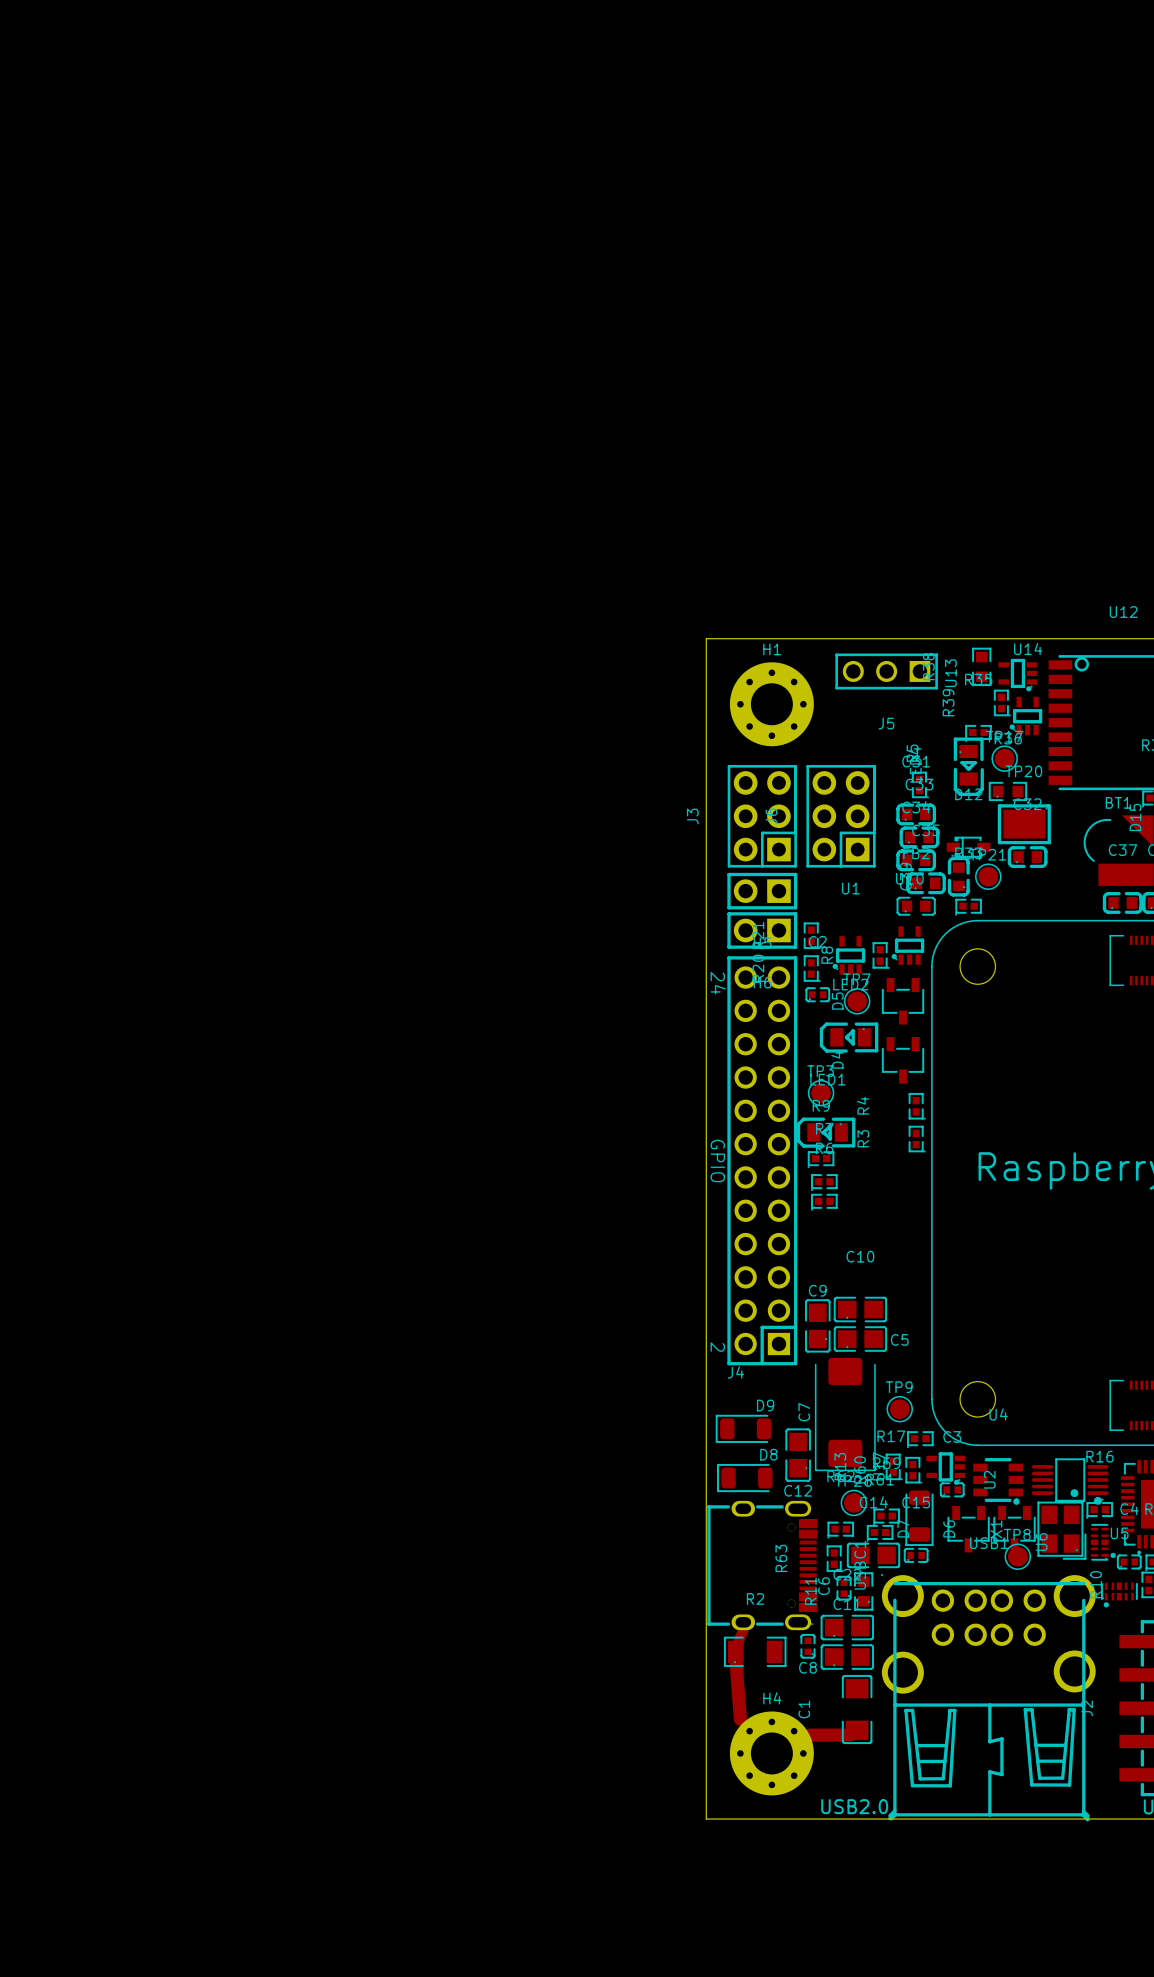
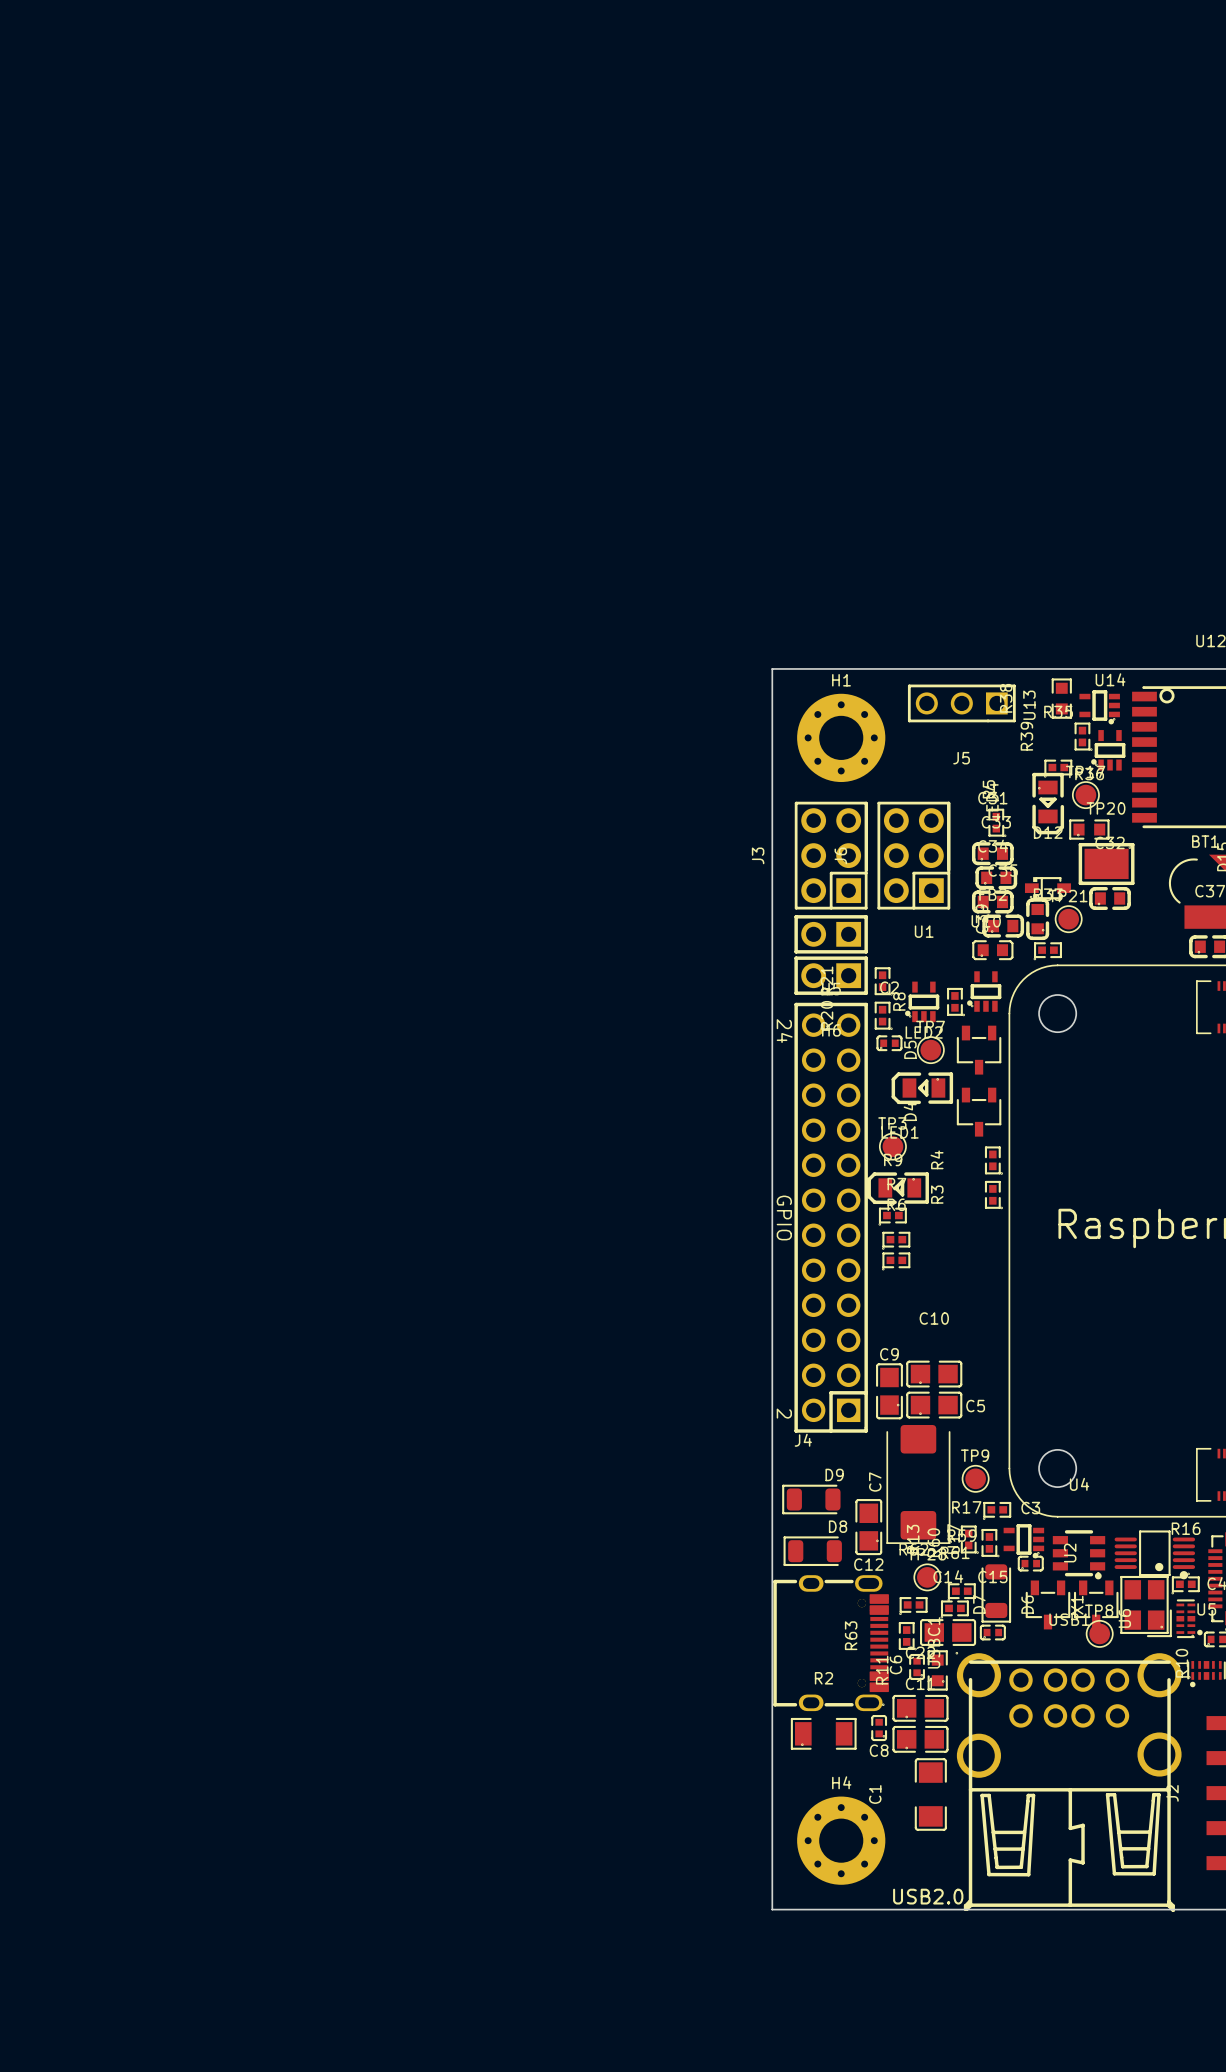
track: (743, 1630) (737, 1643) -> none
track: (735, 1659) (740, 1719) -> none
track: (809, 1735) (850, 1735) -> none

